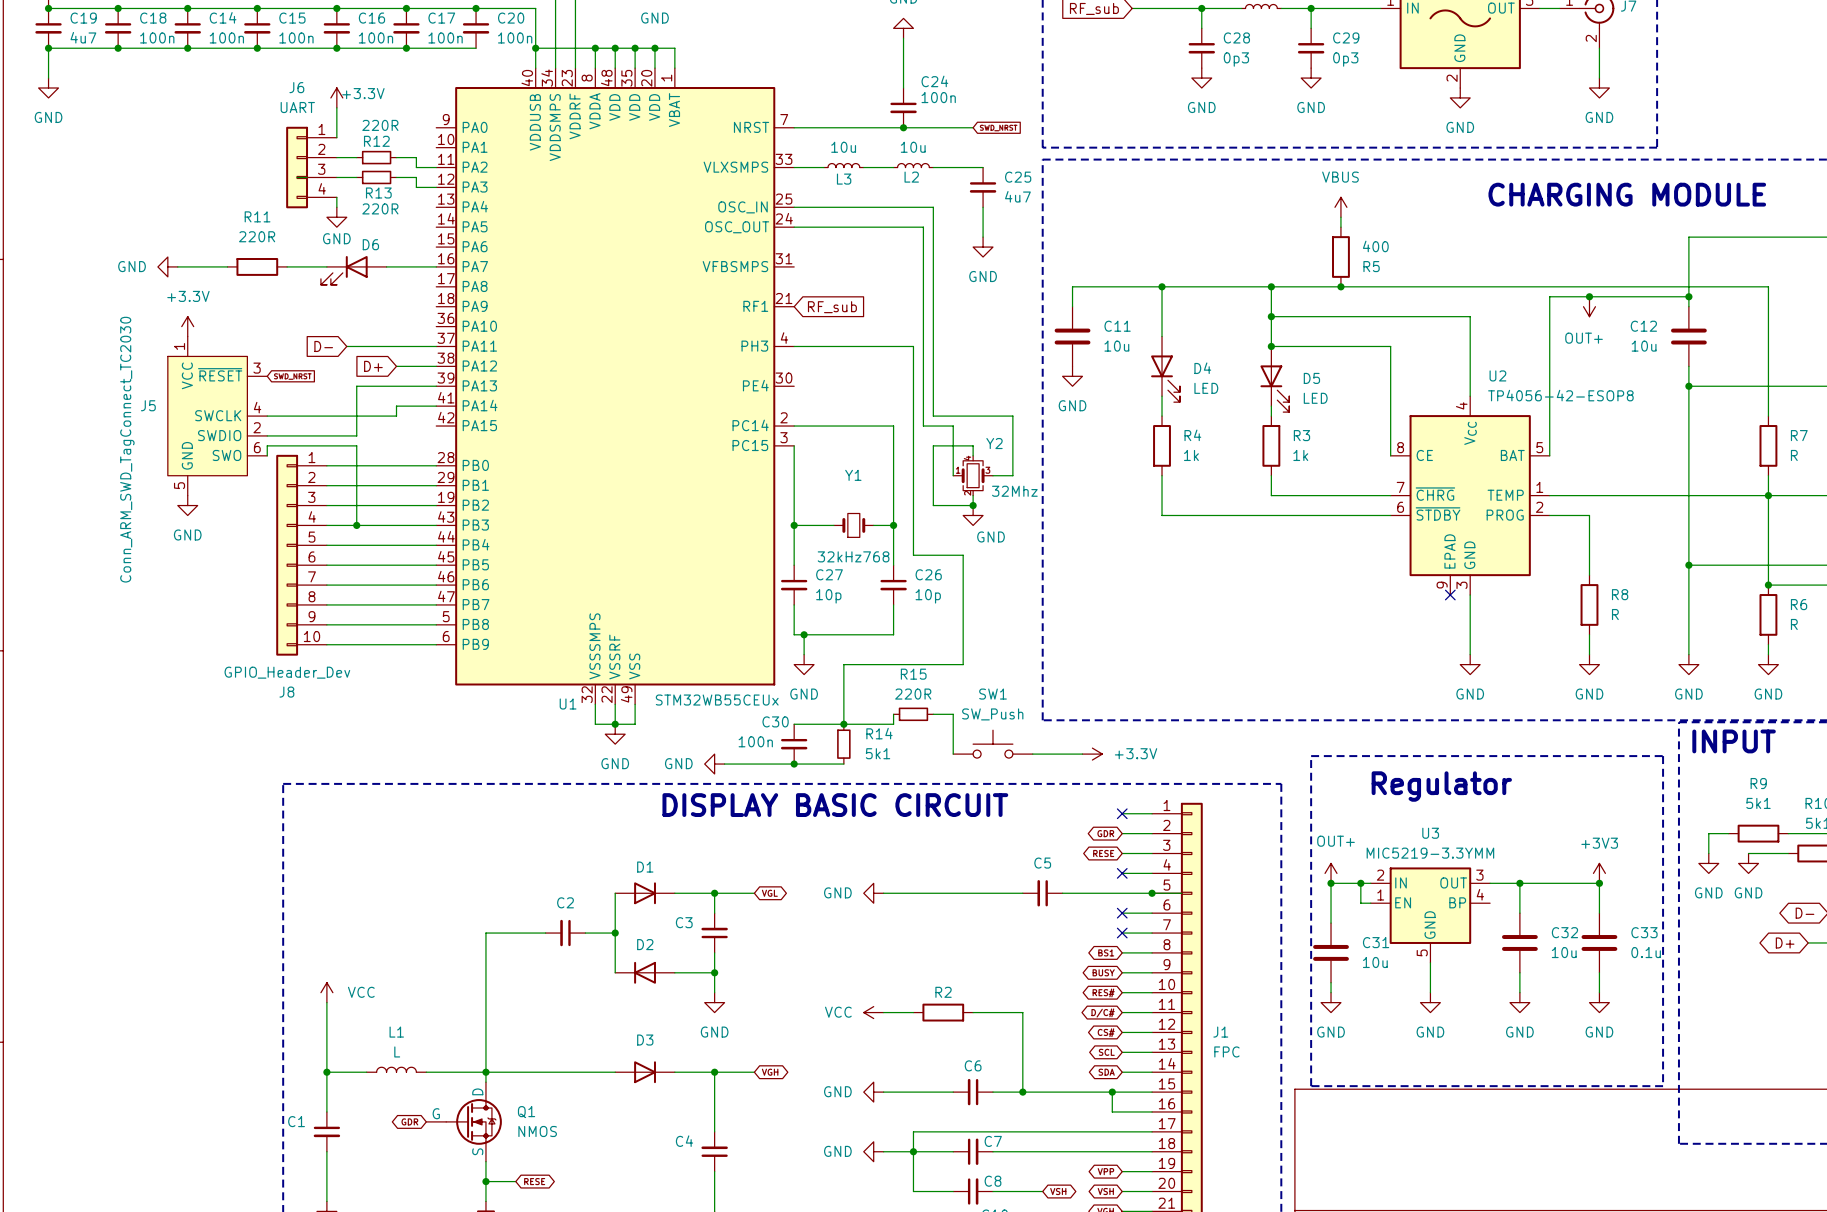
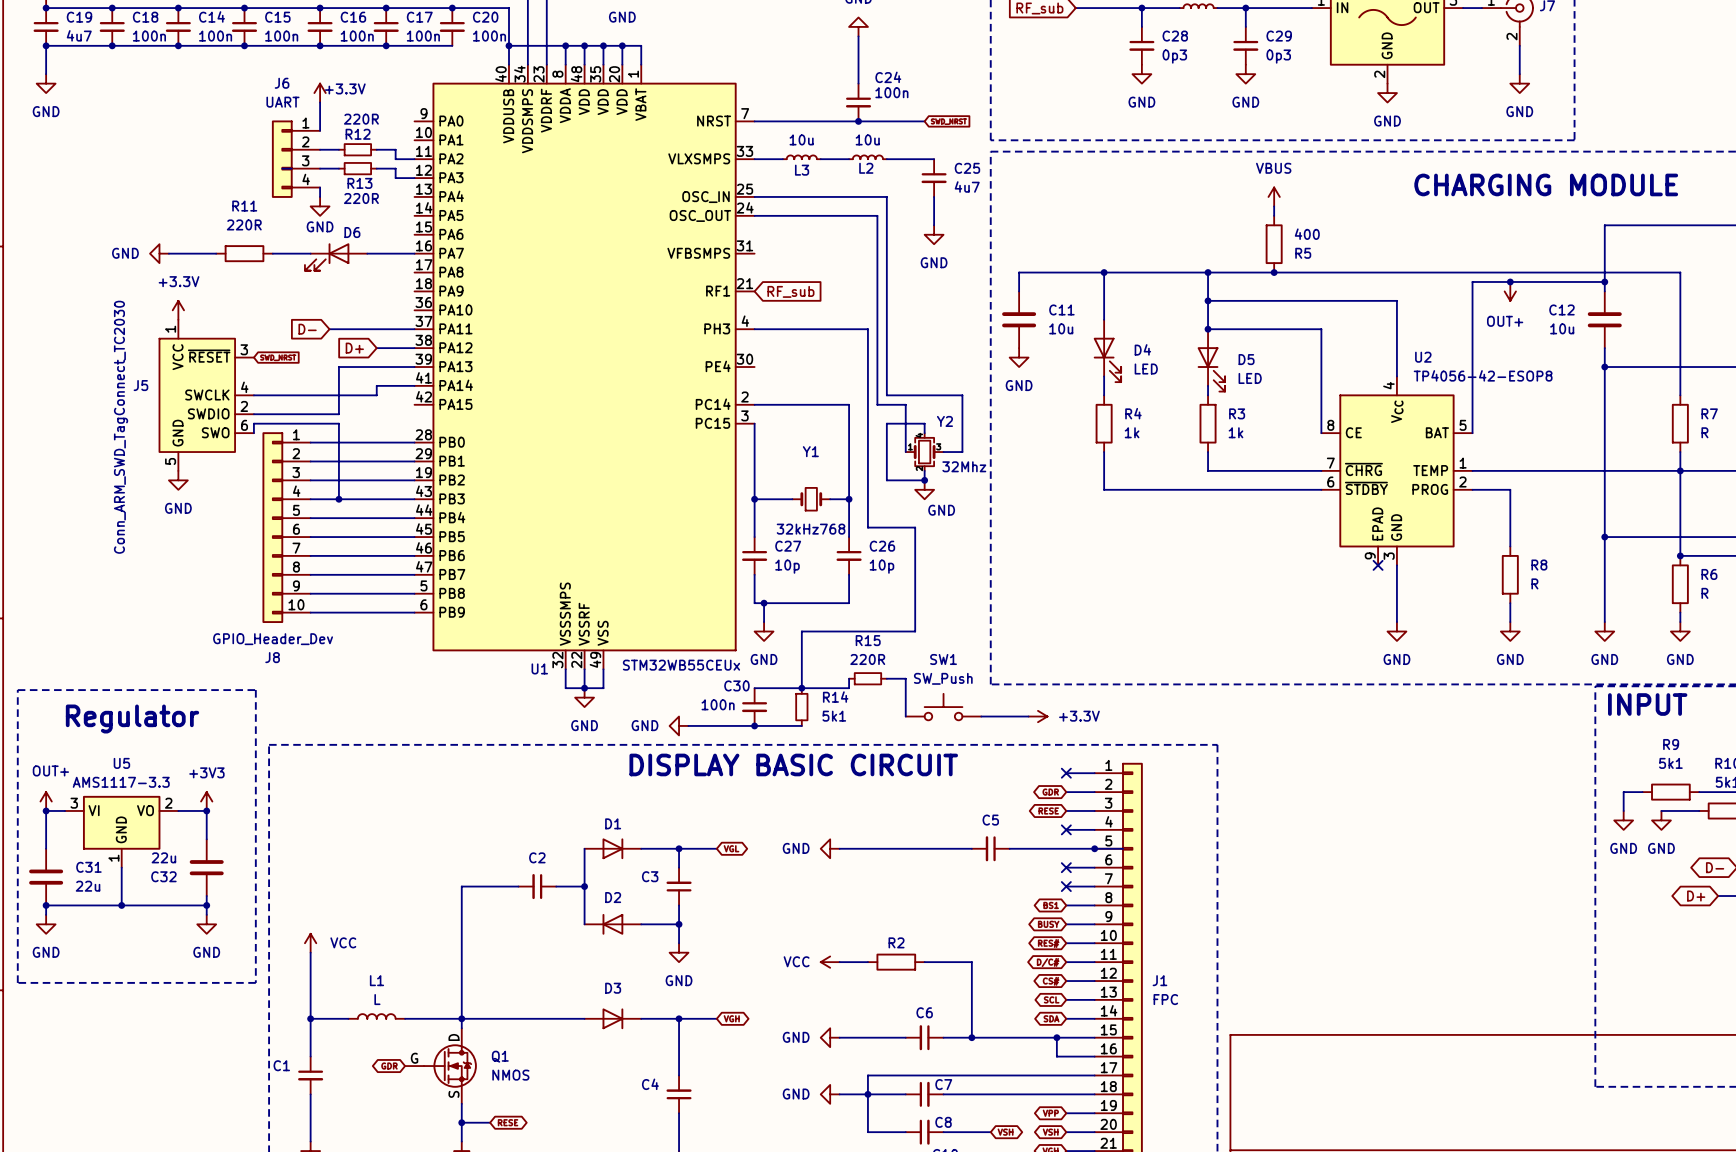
line: none -> (17, 690) (255, 690) (255, 982) (17, 982) (17, 690)
text: none -> Regulator (132, 718)
line: (1311, 756) (1663, 756) (1663, 1086) (1311, 1086) (1311, 756) -> none
text: Regulator (1441, 786) -> none
power symbol: none -> OUT+ (46, 801)
power symbol: none -> +3V3 (206, 801)
junction: none -> (46, 810)
wire: none -> (65, 810) (46, 810) (46, 848)
wire: none -> (178, 810) (206, 810) (206, 839)
junction: none -> (206, 810)
power symbol: OUT+ (1331, 873) -> none
power symbol: +3V3 (1599, 873) -> none
U5: none -> AMS1117-3.3 (121, 831)
junction: (1331, 883) -> none
wire: (1360, 883) (1360, 903) (1370, 903) -> none
junction: (1360, 883) -> none
wire: (1370, 883) (1331, 883) (1331, 923) -> none
wire: (1490, 883) (1599, 883) (1599, 913) -> none
wire: (1519, 883) (1519, 913) -> none
junction: (1519, 883) -> none
junction: (1599, 883) -> none
wire: none -> (121, 867) (121, 905)
U3: MIC5219-3.3YMM (1430, 915) -> none
C32 name position: C32 (1564, 932) -> C32 (163, 876)
wire: none -> (206, 896) (206, 914)
C32 position: (1519, 942) -> (206, 867)
C33: 0.1u (1599, 942) -> none
junction: none -> (46, 905)
junction: none -> (121, 905)
wire: none -> (206, 905) (46, 905) (46, 914)
junction: none -> (206, 905)
C31 position: (1331, 952) -> (46, 877)
C32 value: 10u (1564, 952) -> 22u (163, 857)
C31 value: 10u (1375, 962) -> 22u (88, 886)
wire: (1430, 962) (1430, 992) -> none
power symbol: none -> GND (46, 924)
power symbol: none -> GND (206, 924)
wire: (1519, 972) (1519, 992) -> none
wire: (1599, 972) (1599, 992) -> none
wire: (1331, 982) (1331, 992) -> none
power symbol: GND (1331, 1002) -> none
power symbol: GND (1430, 1002) -> none
power symbol: GND (1519, 1002) -> none
power symbol: GND (1599, 1002) -> none

